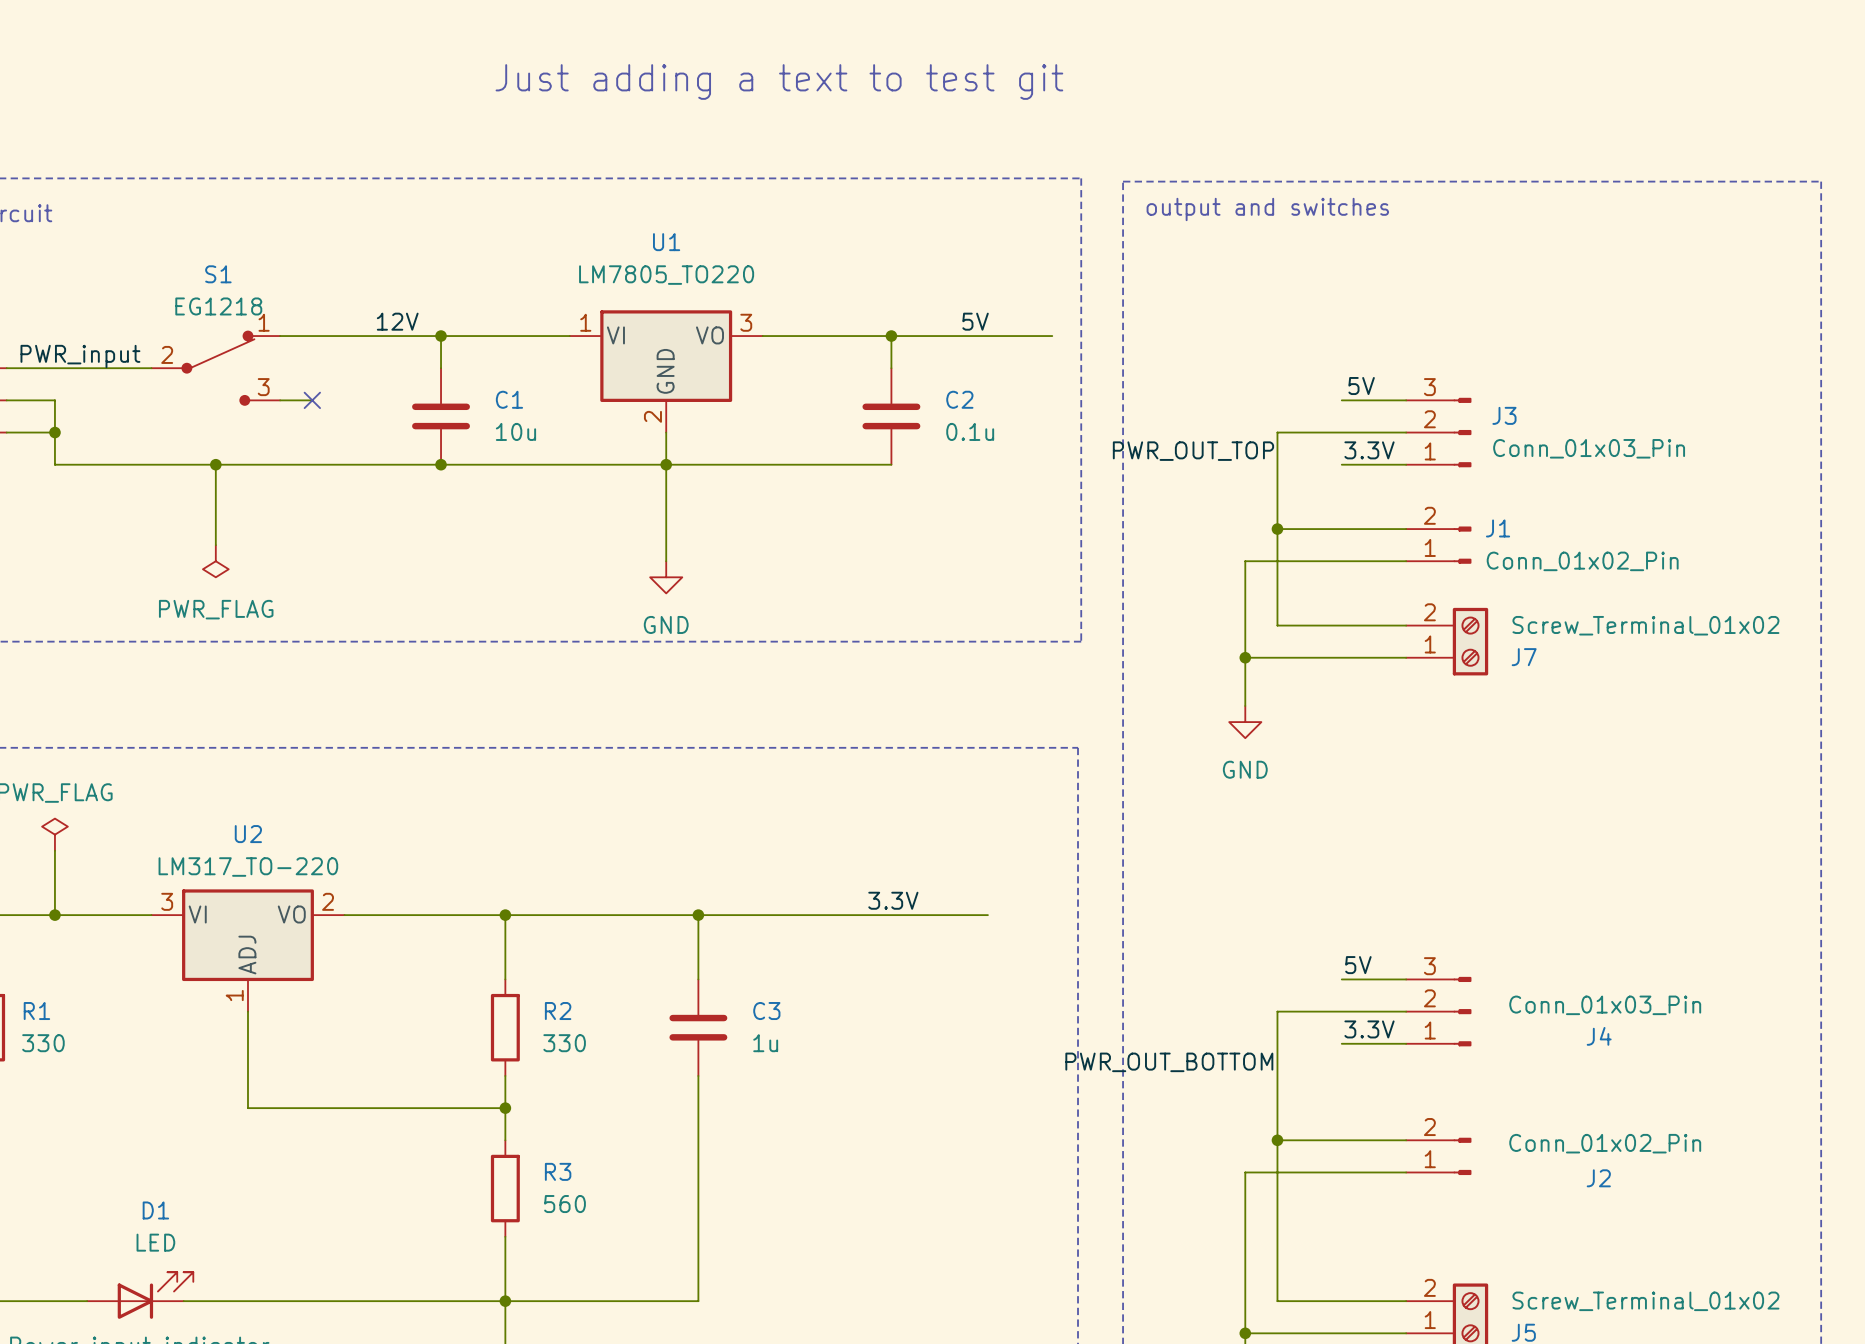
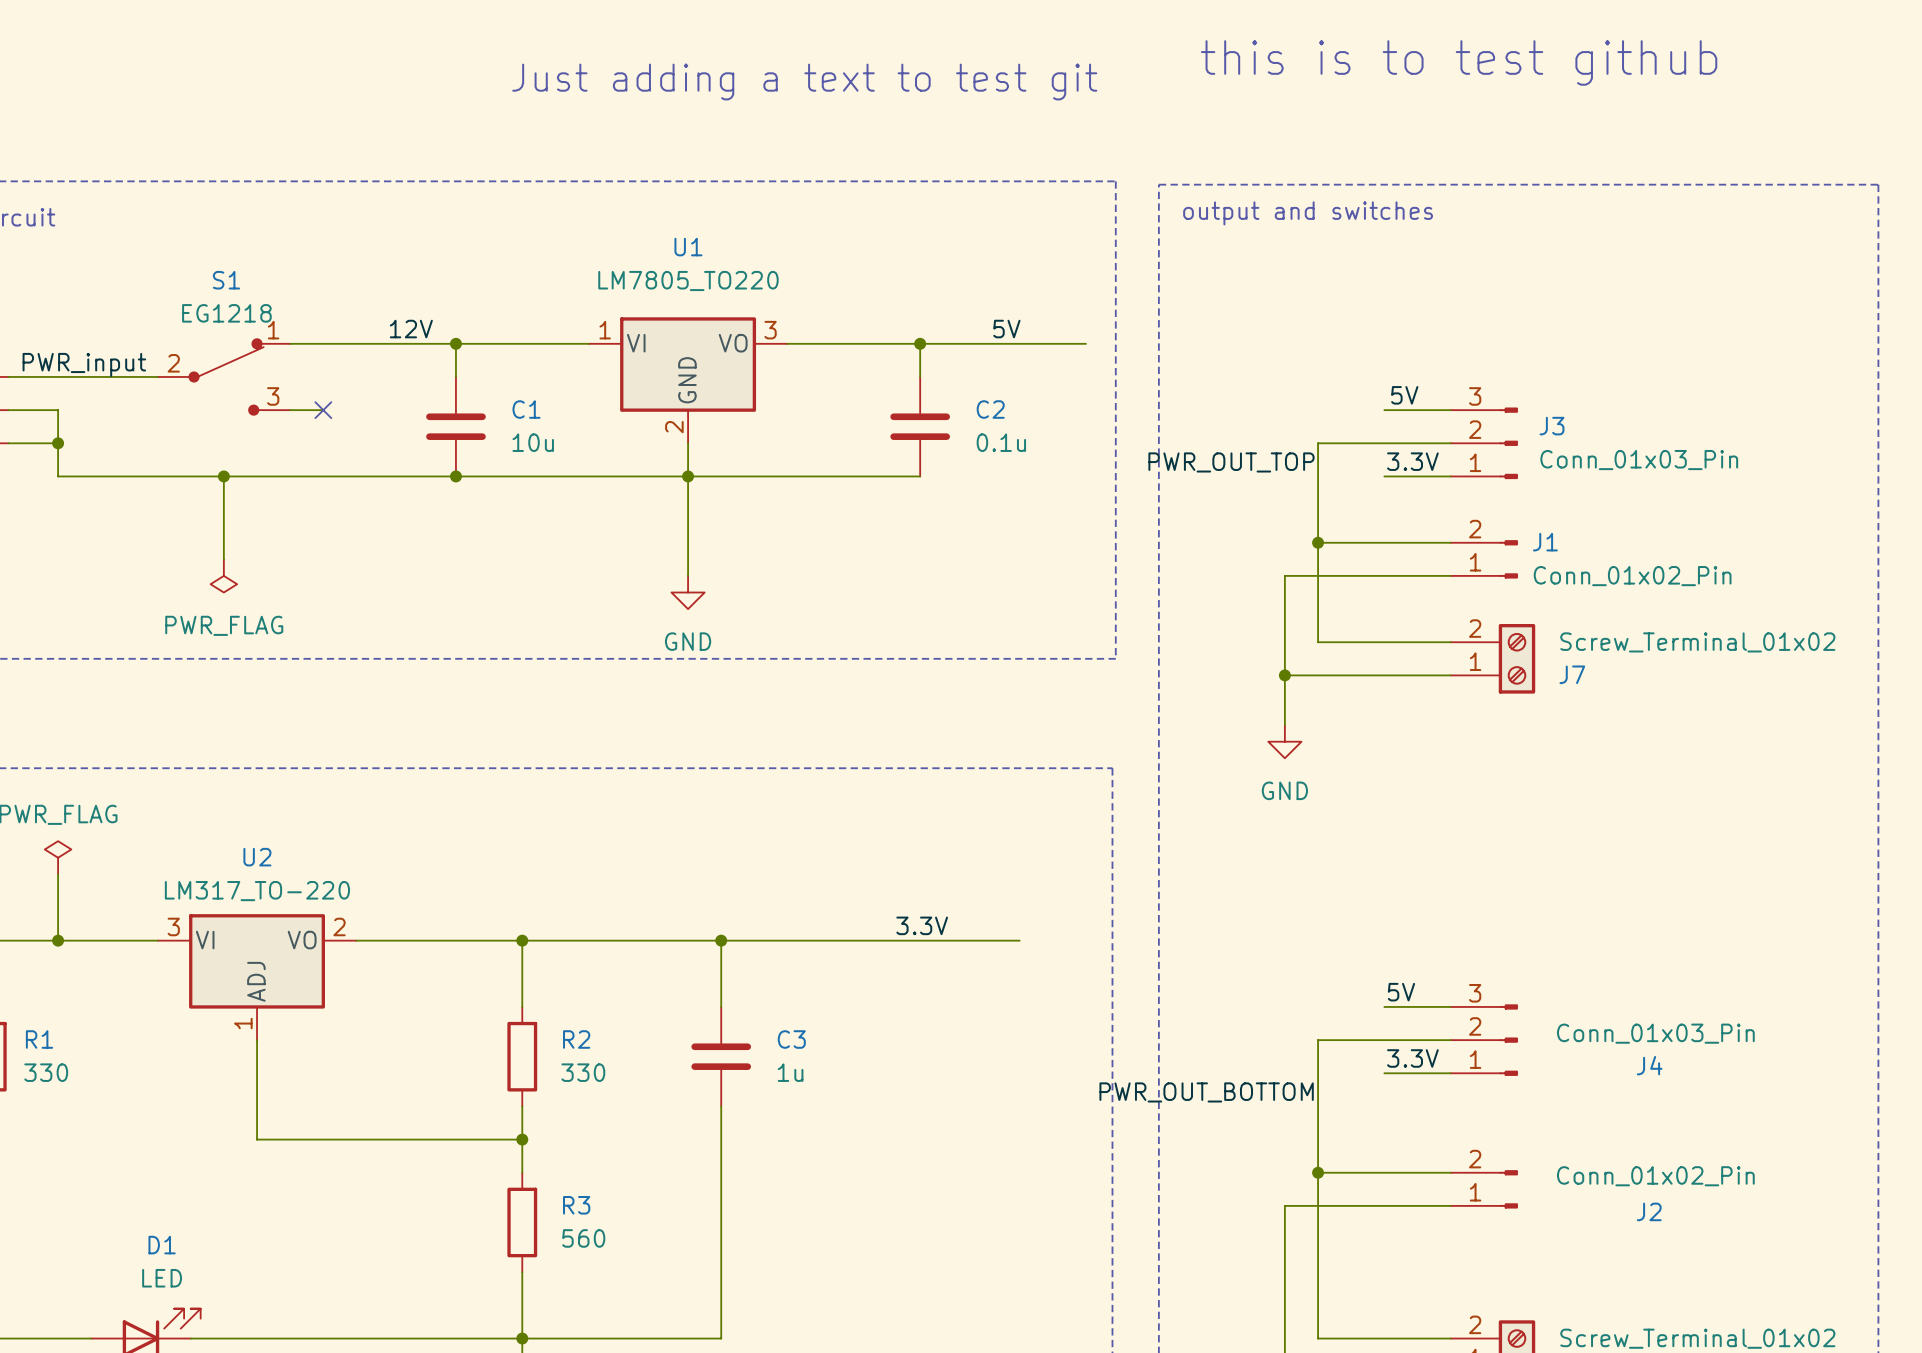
text: none -> this is to test github (1459, 62)

